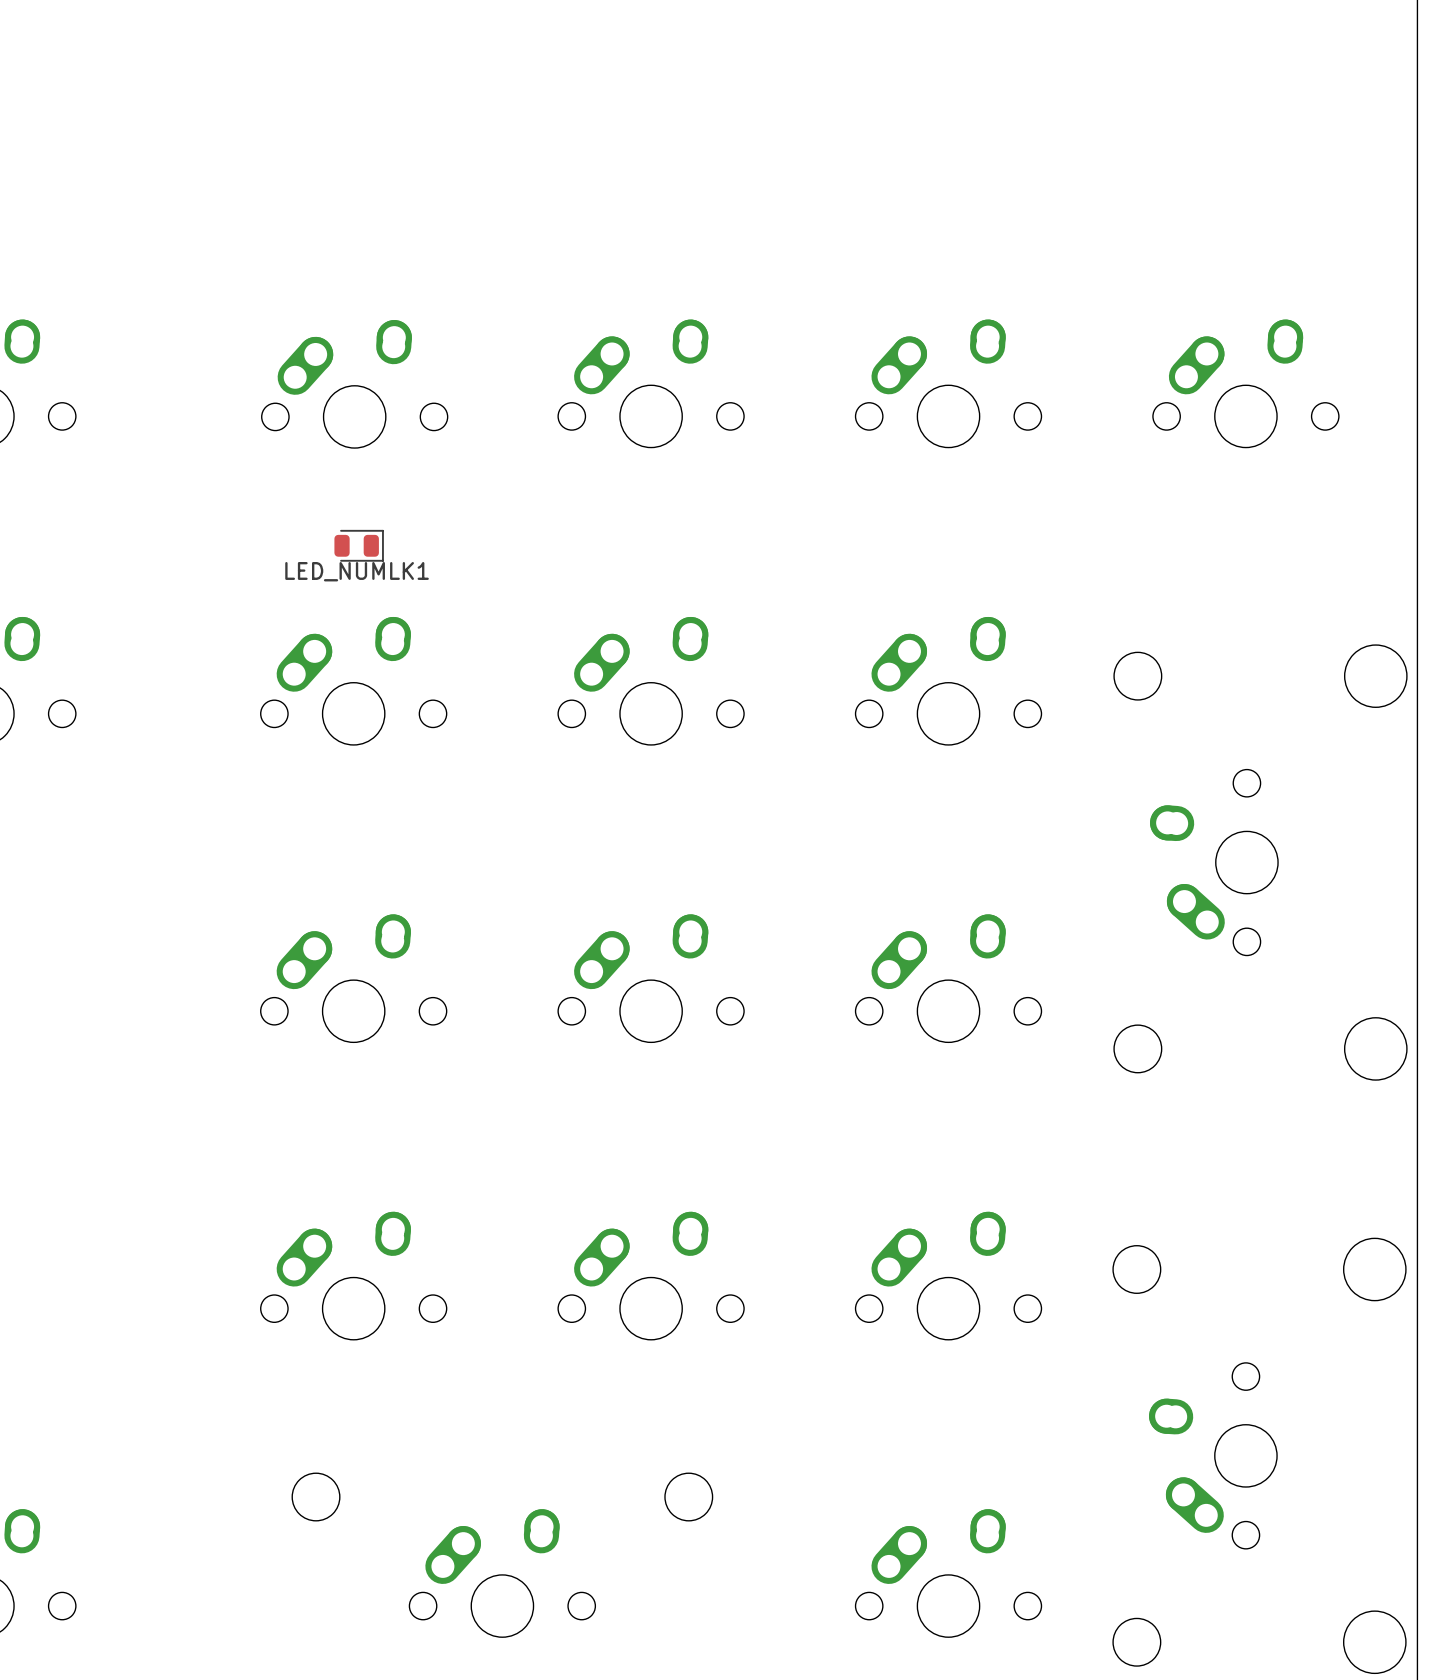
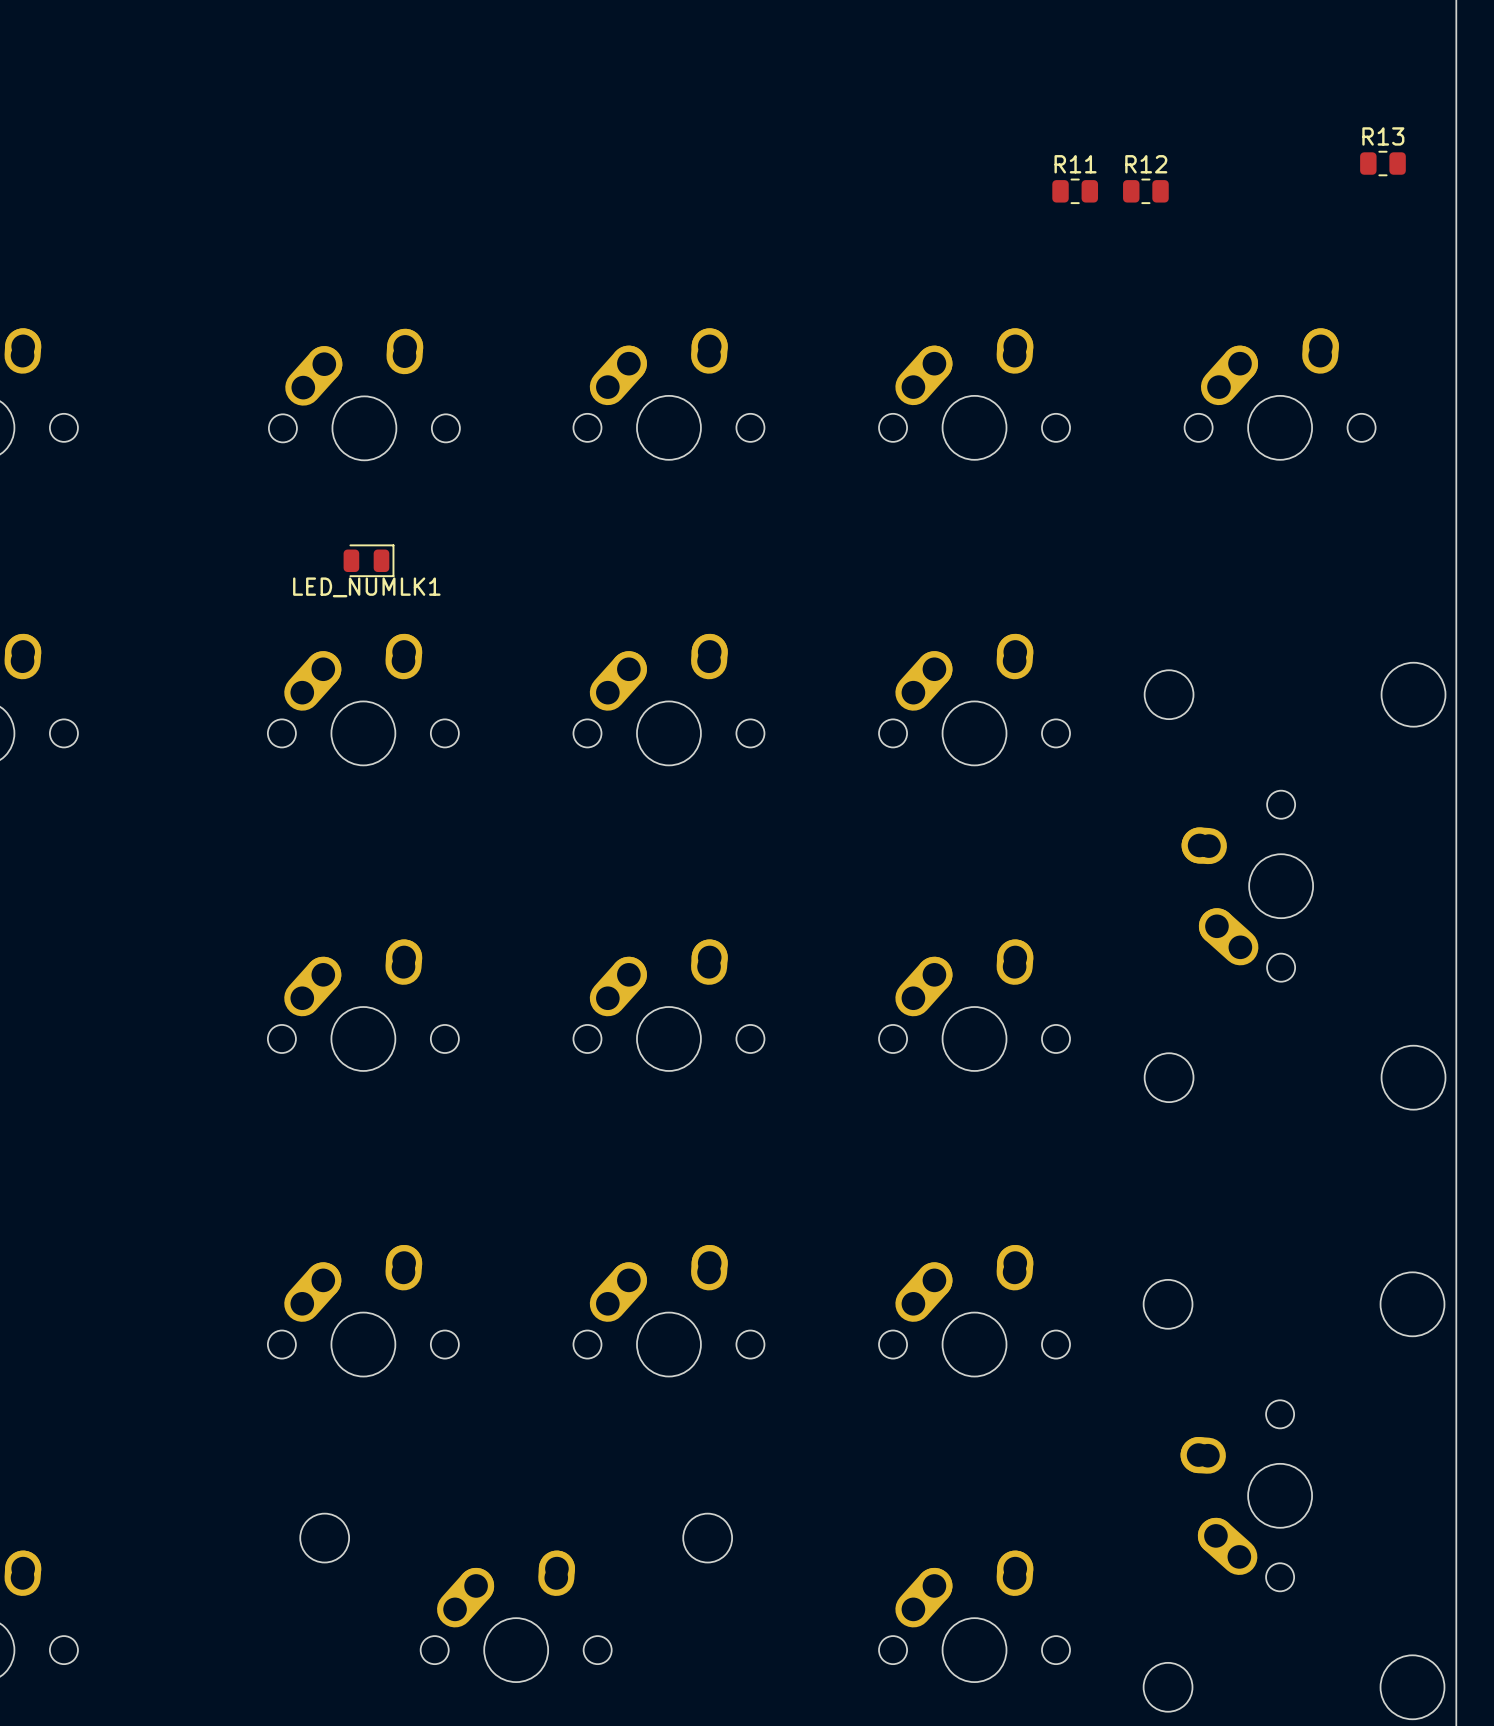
R13: none -> (1382, 163)
R11: none -> (1075, 191)
R12: none -> (1145, 191)

